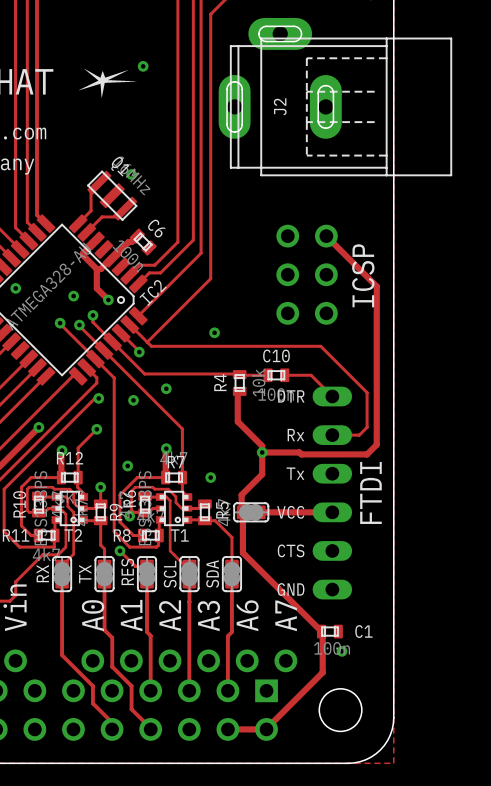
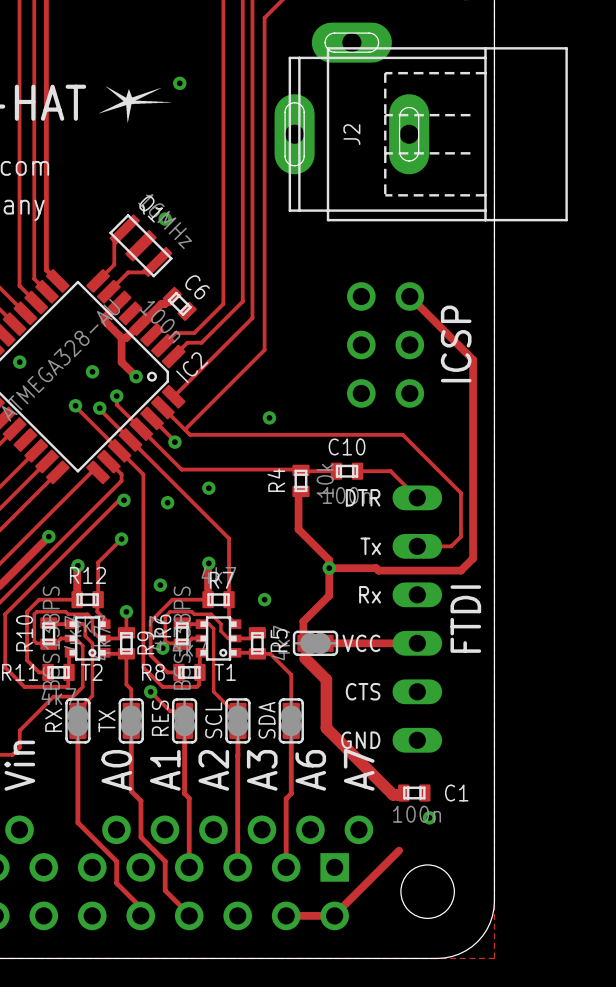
text: Rx (296, 435) -> Tx (370, 546)
text: Tx (295, 473) -> Rx (370, 594)
track: (242, 524) (242, 552) (322, 632) (322, 672) (317, 677) -> (305, 658) (326, 679) (326, 728) (393, 794) (399, 794)

